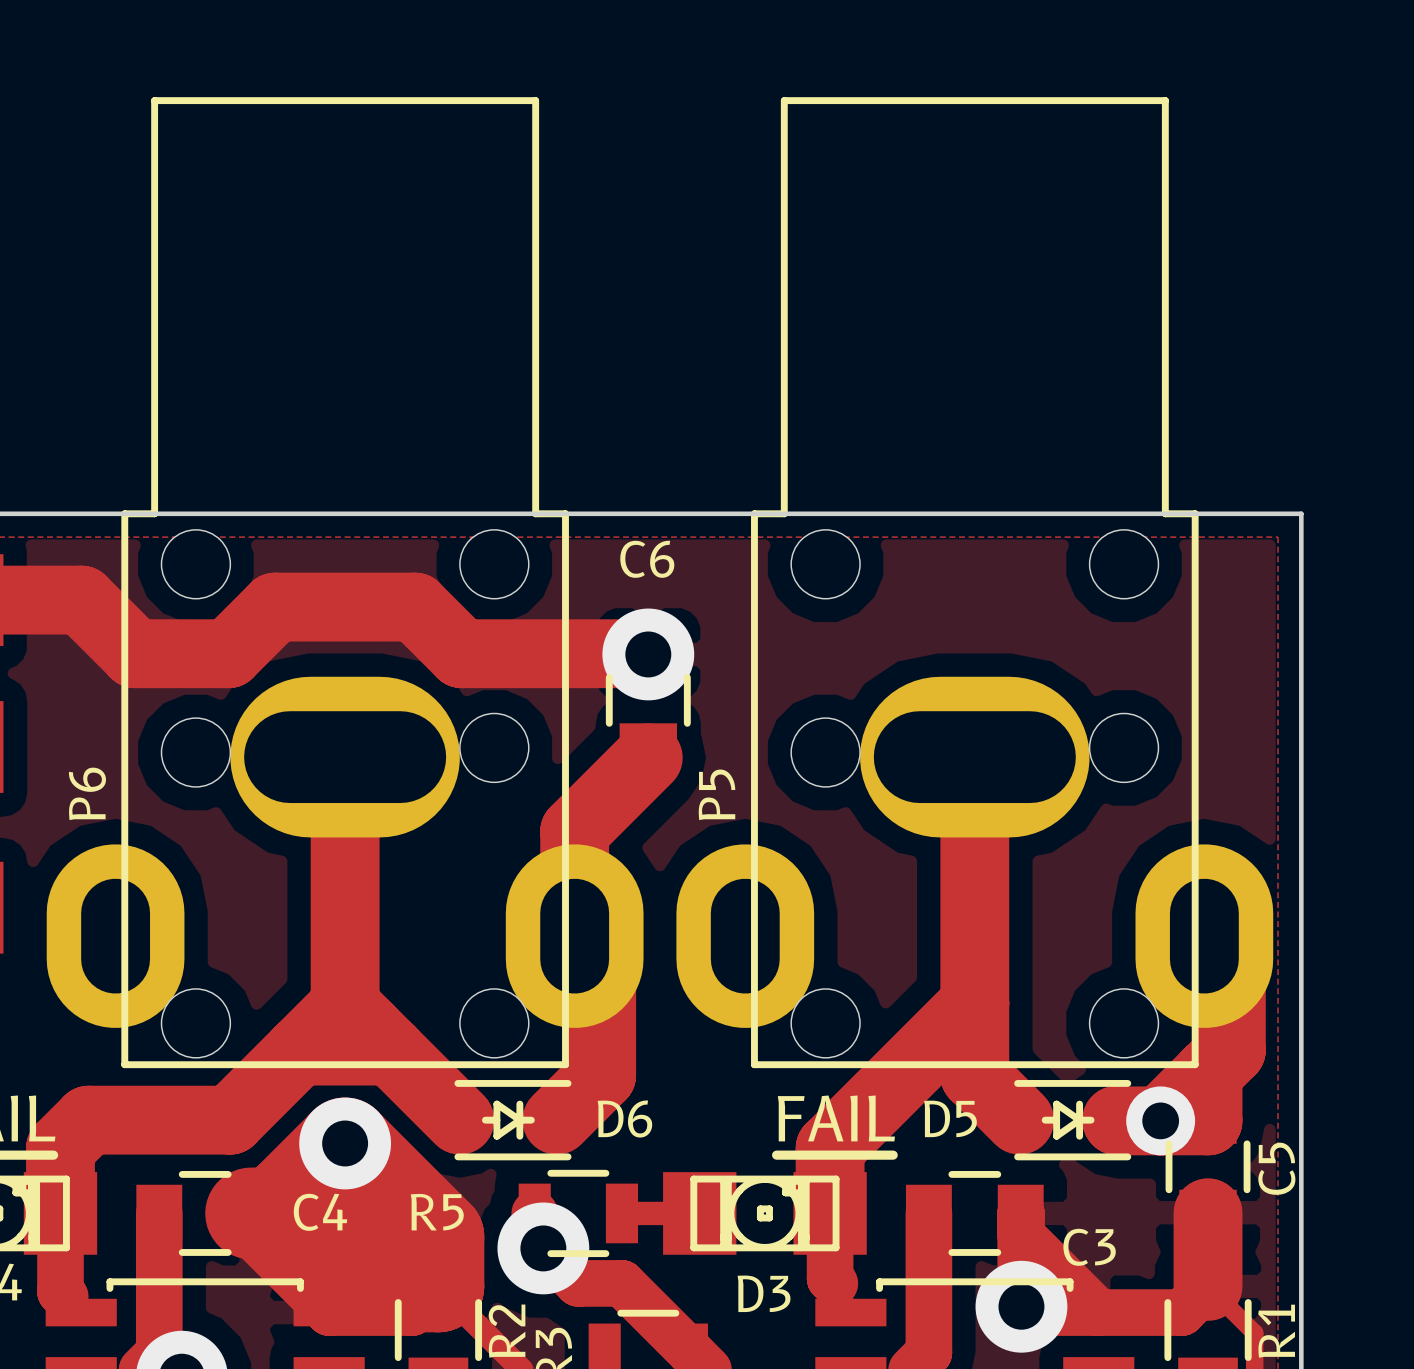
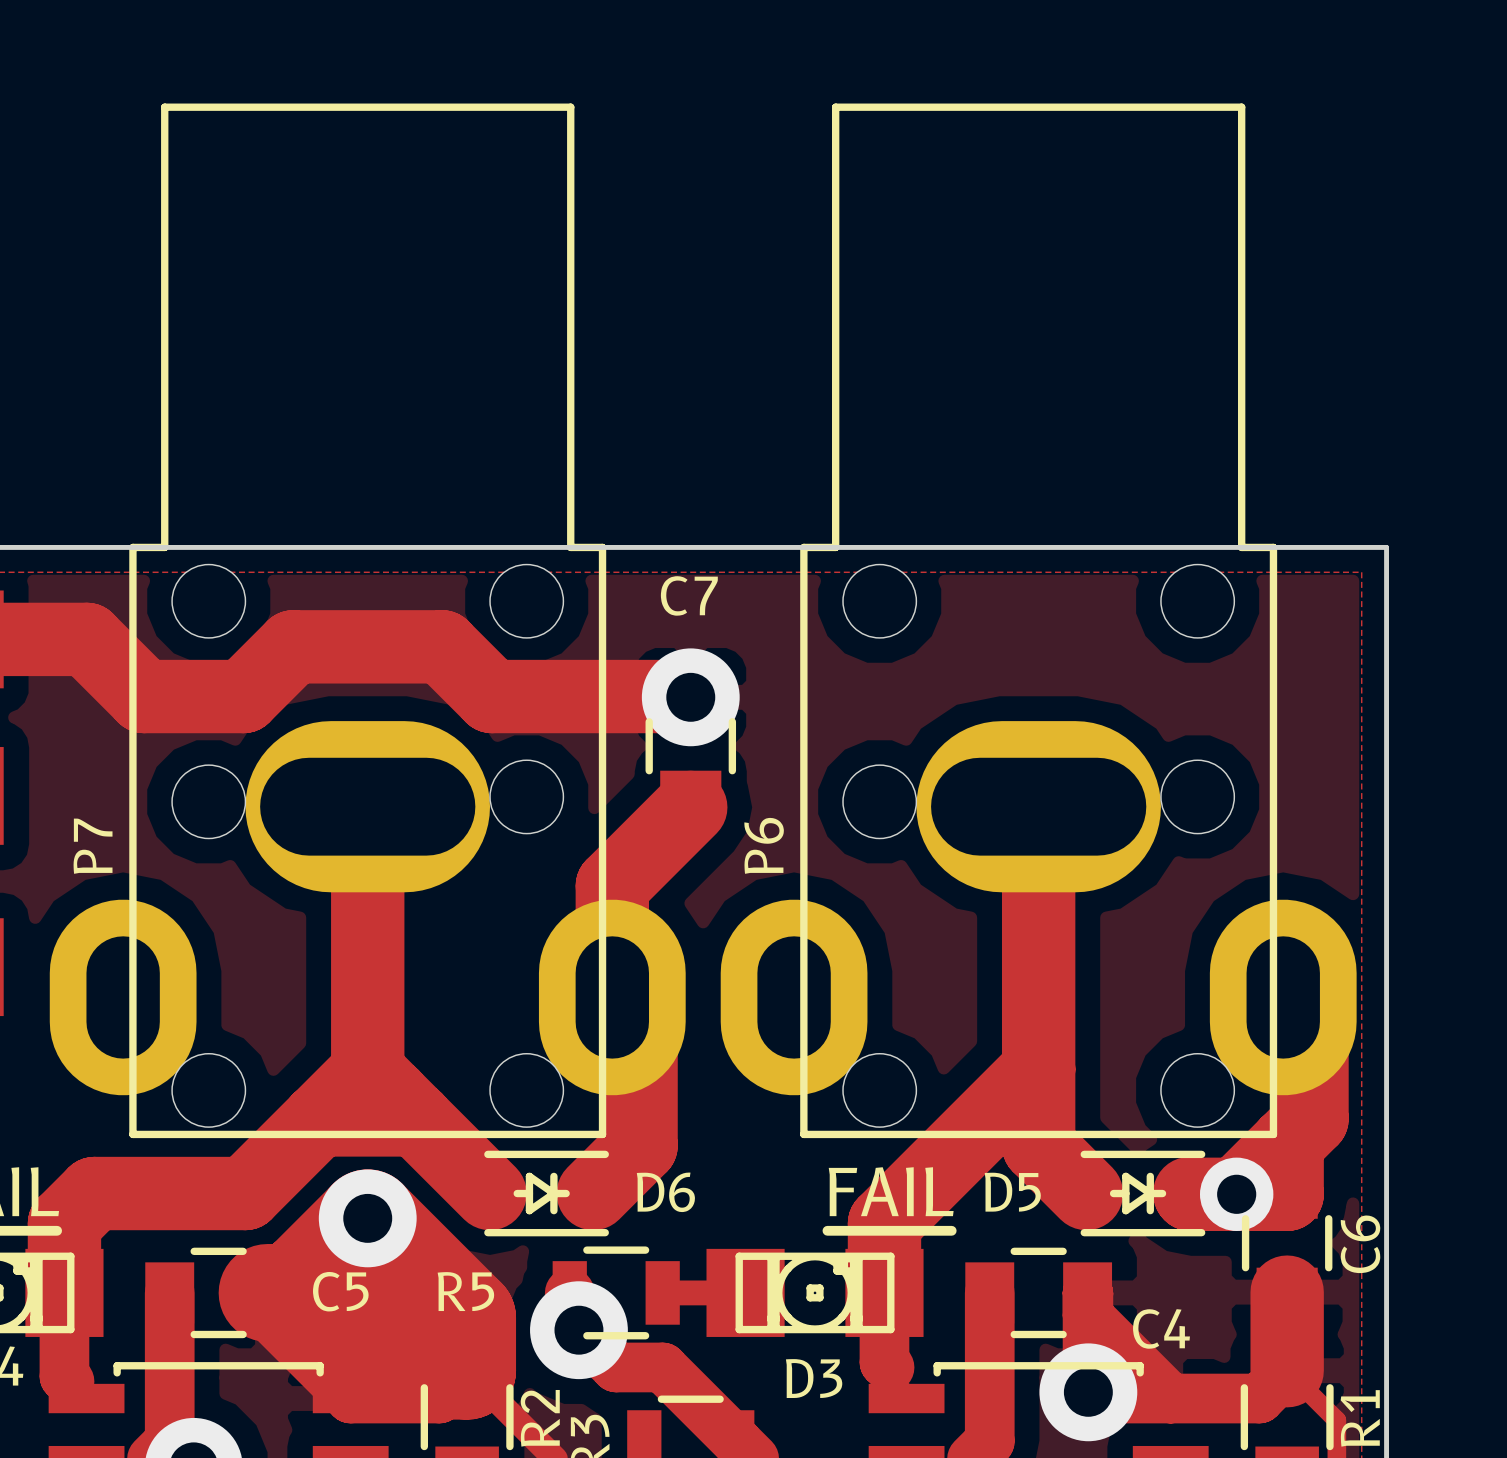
C6 name: C6 (647, 559) -> C7 (689, 595)
P6 name: P6 (87, 793) -> P7 (93, 846)
P5 name: P5 (717, 794) -> P6 (764, 845)
C5 name: C5 (1276, 1168) -> C6 (1360, 1244)
C4 name: C4 (320, 1212) -> C5 (340, 1291)
C3 name: C3 (1089, 1247) -> C4 (1161, 1328)

